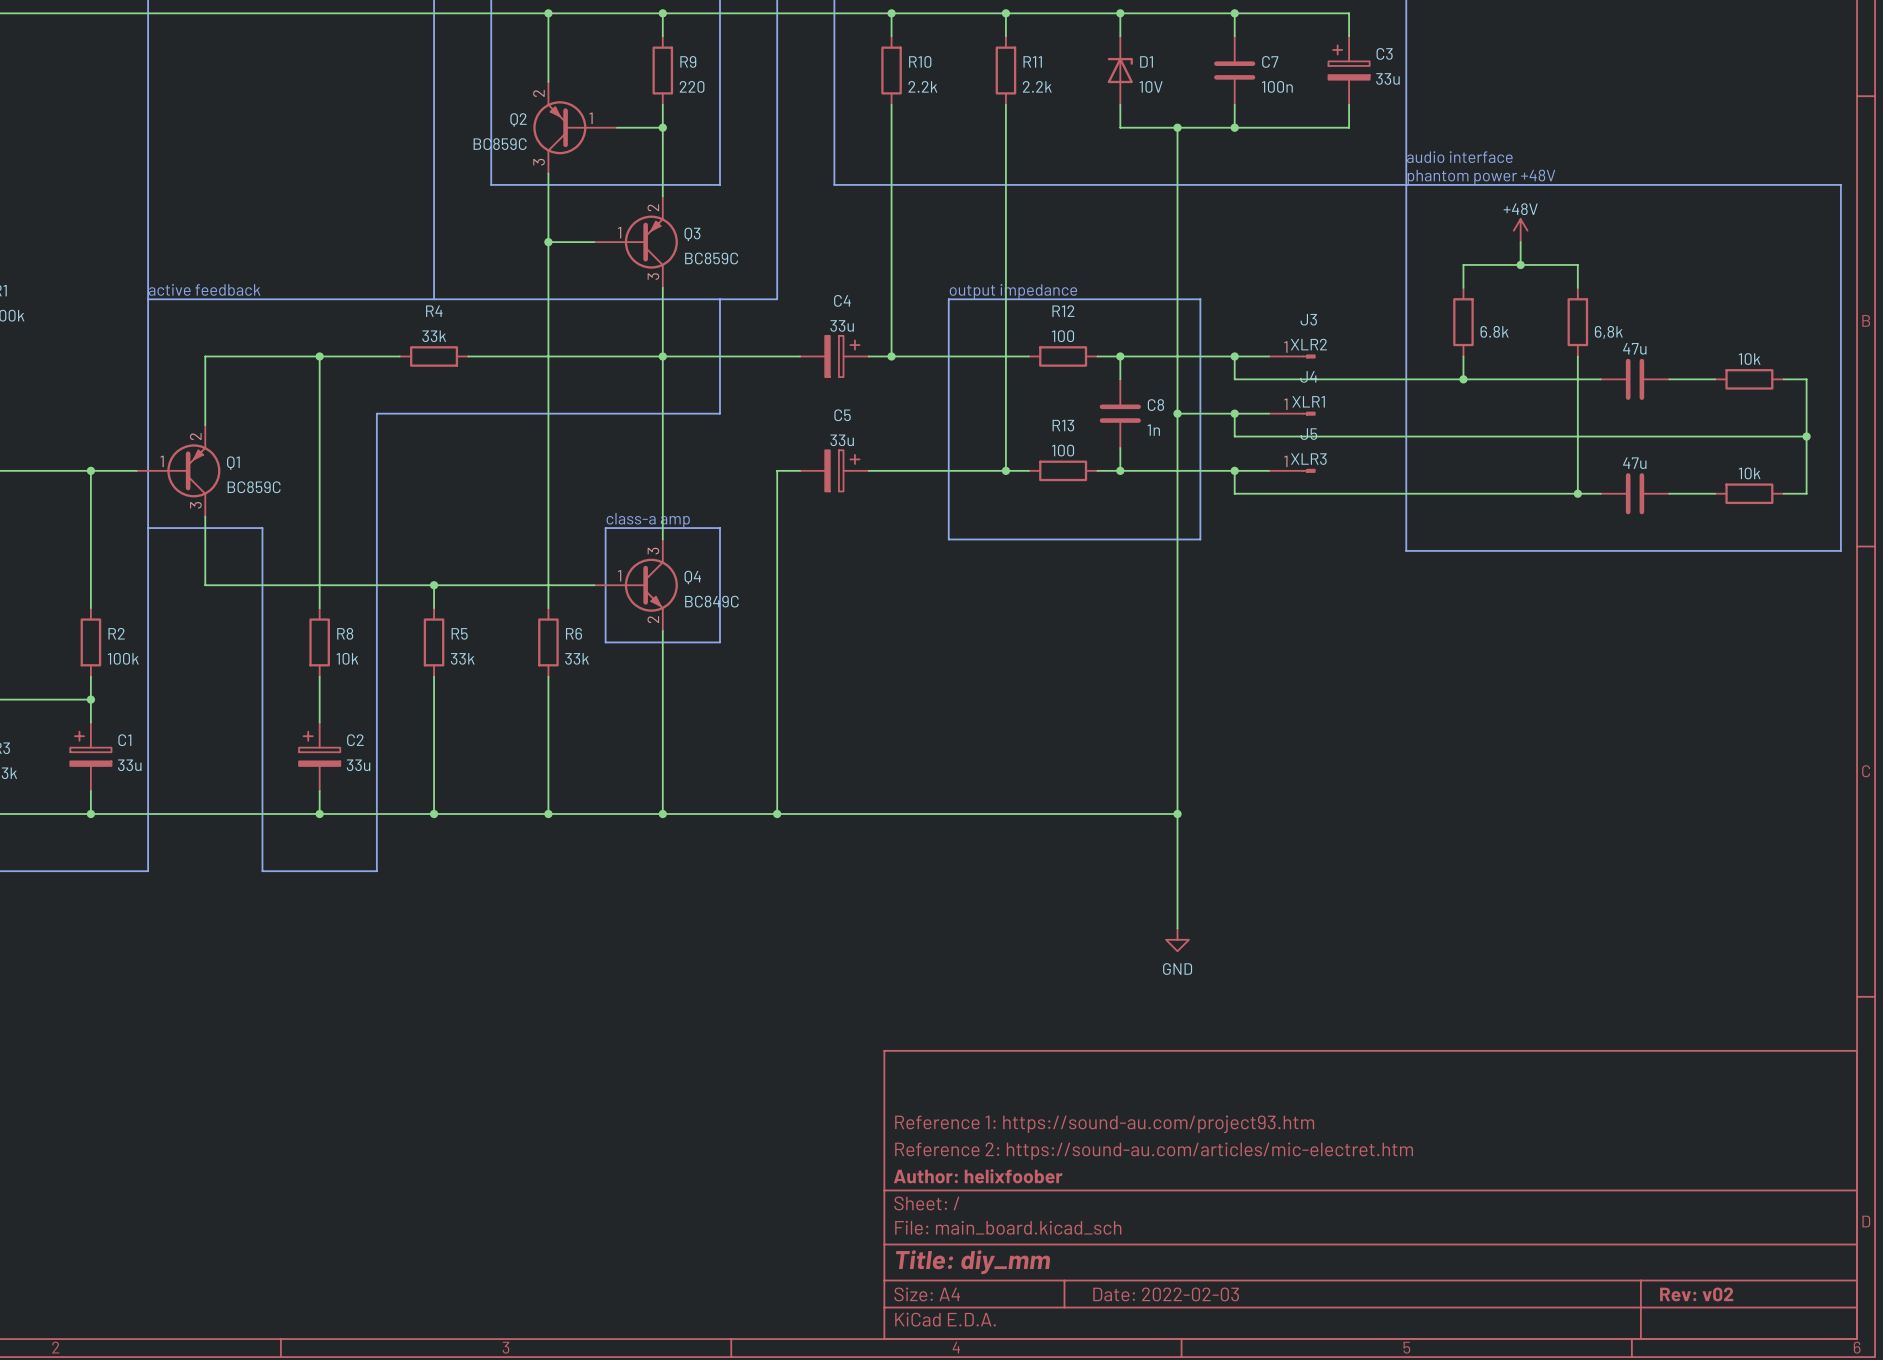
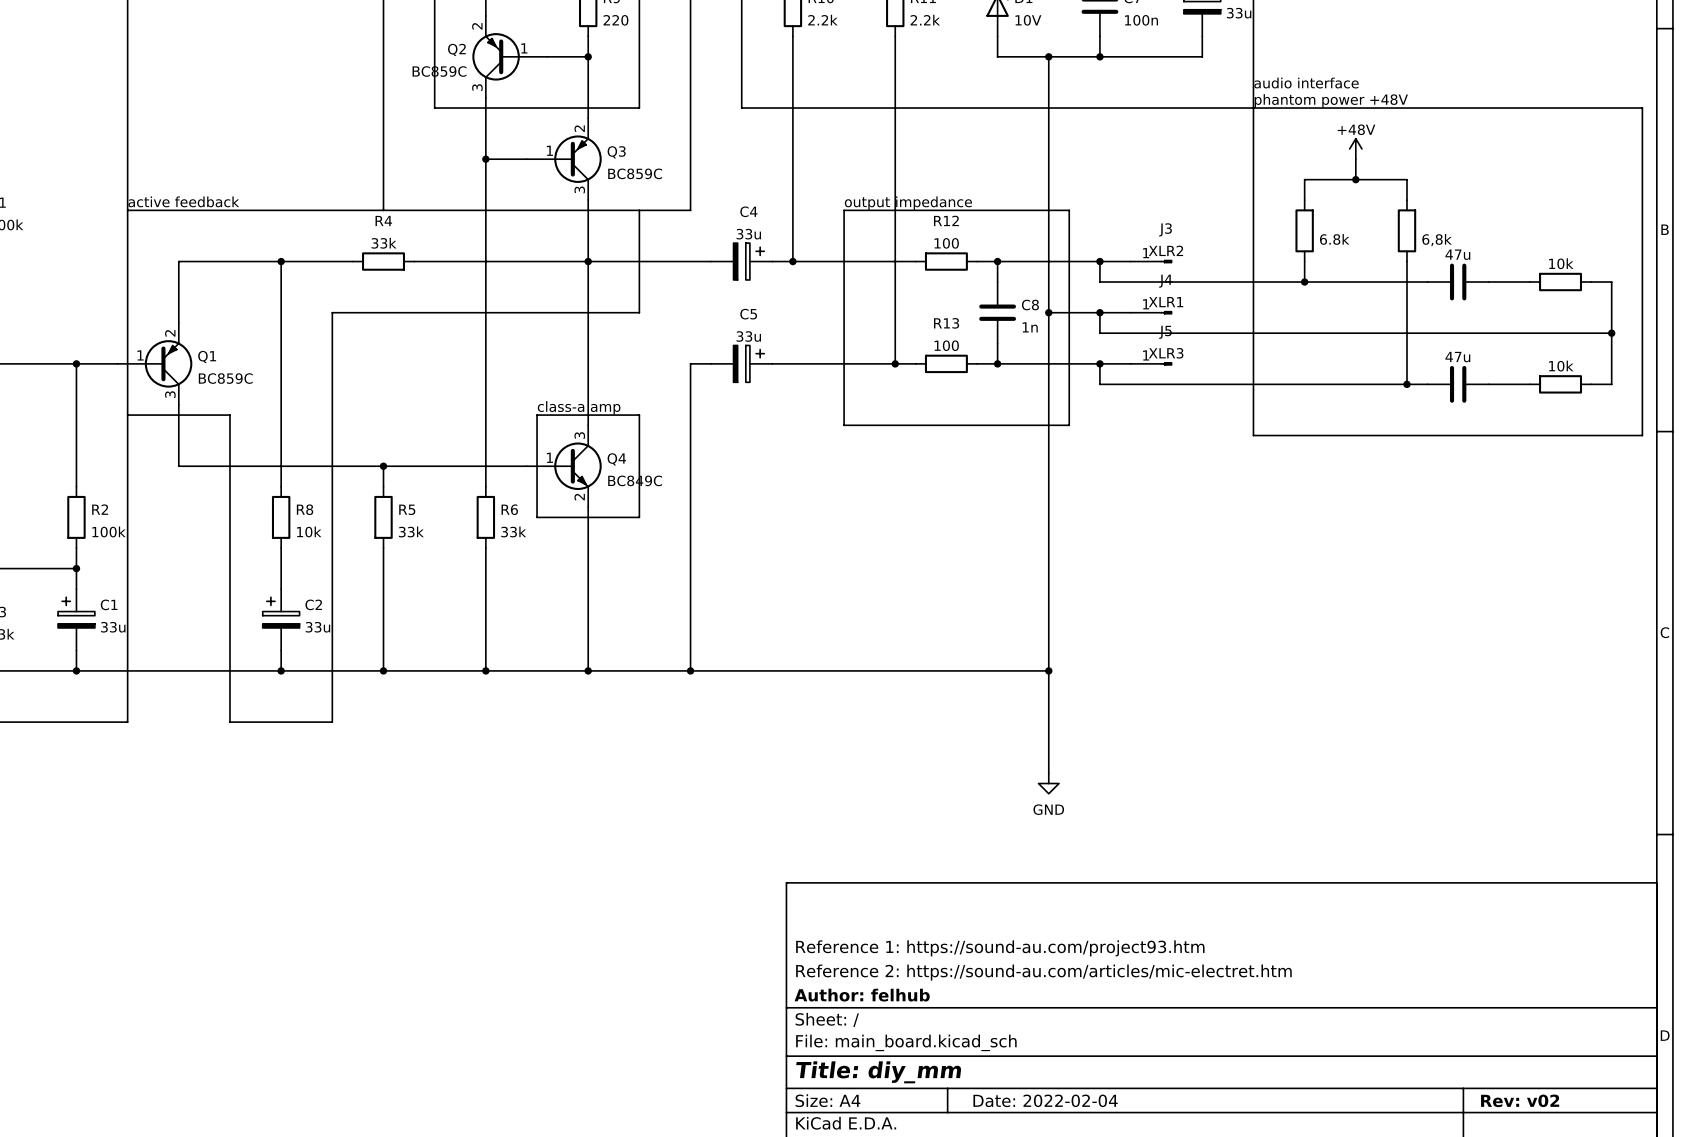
title block: Author: helixfoober (978, 1176) -> Author: felhub (862, 995)
title block: Date: 2022-02-03 (1166, 1294) -> Date: 2022-02-04 (1045, 1100)

